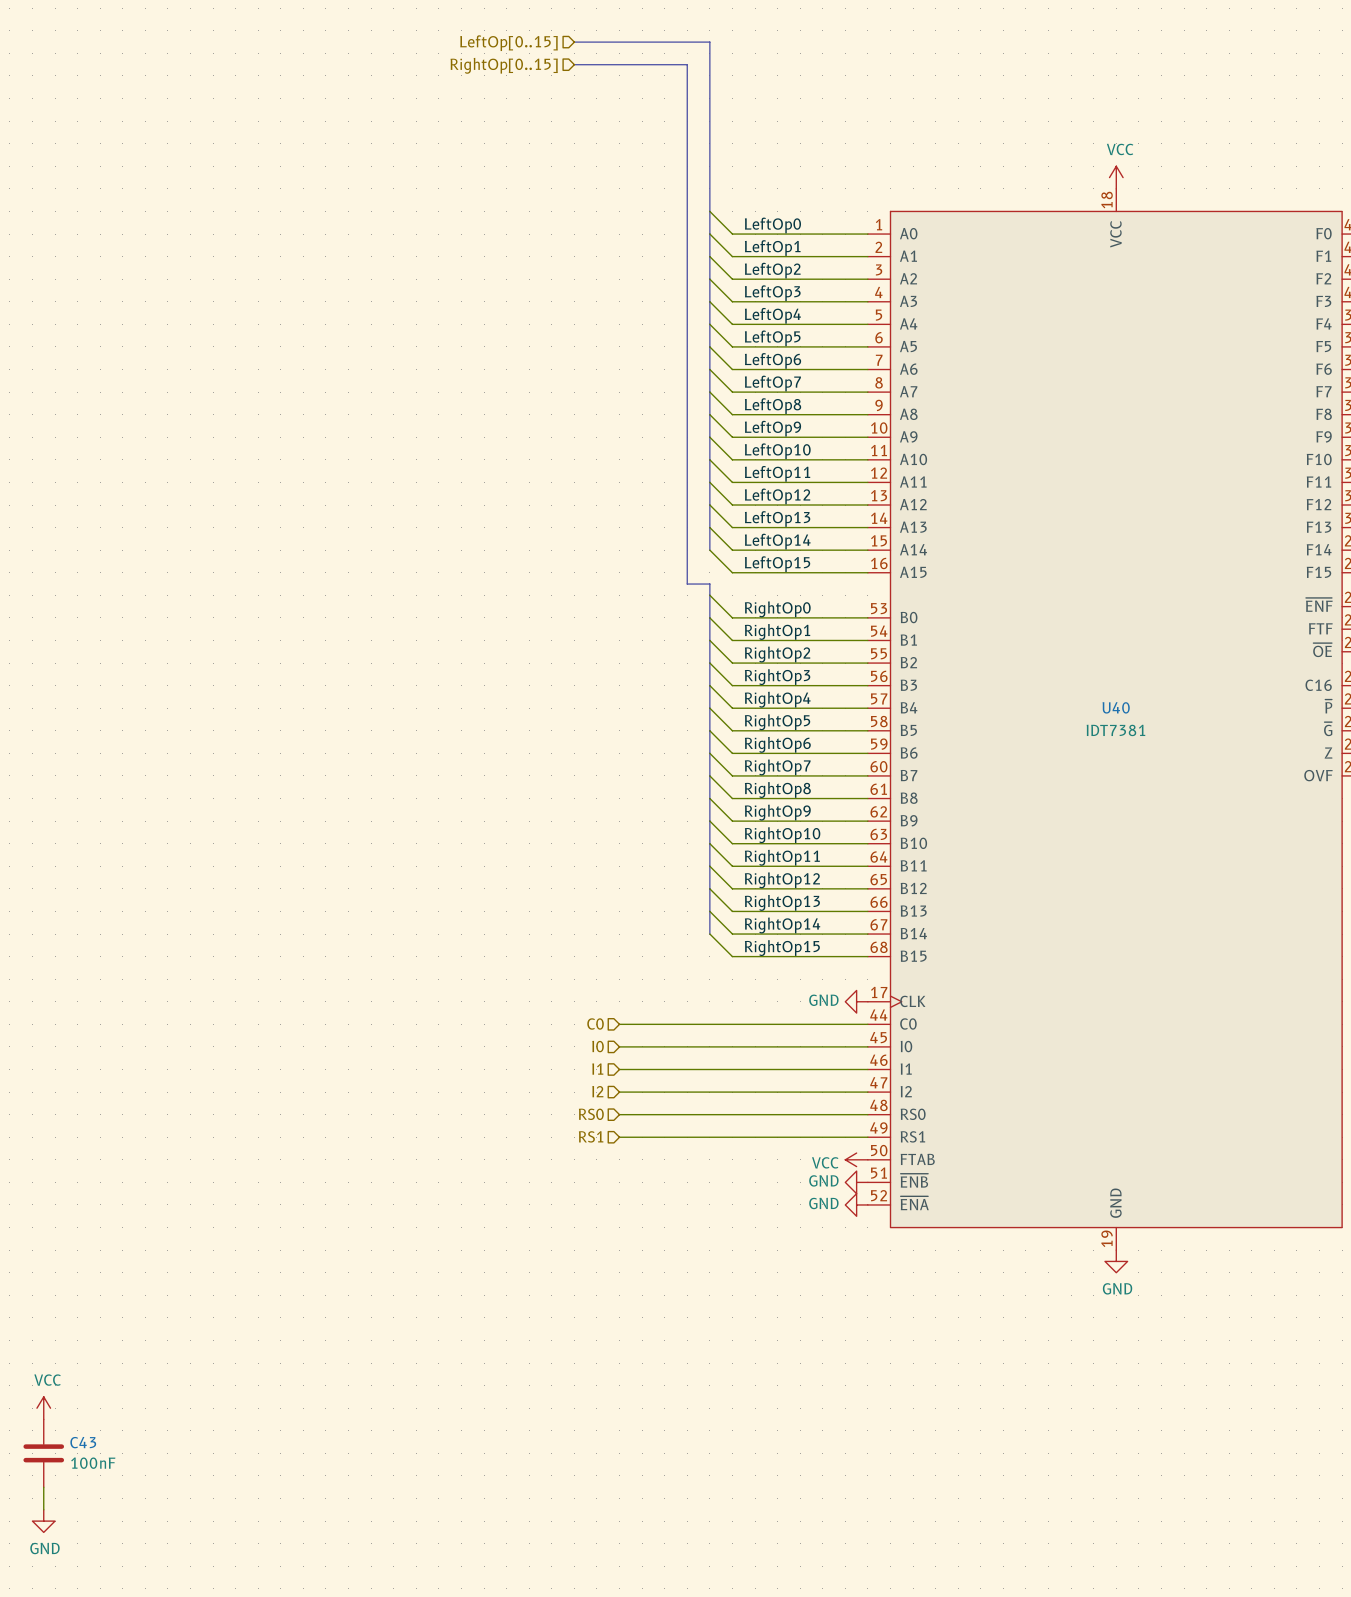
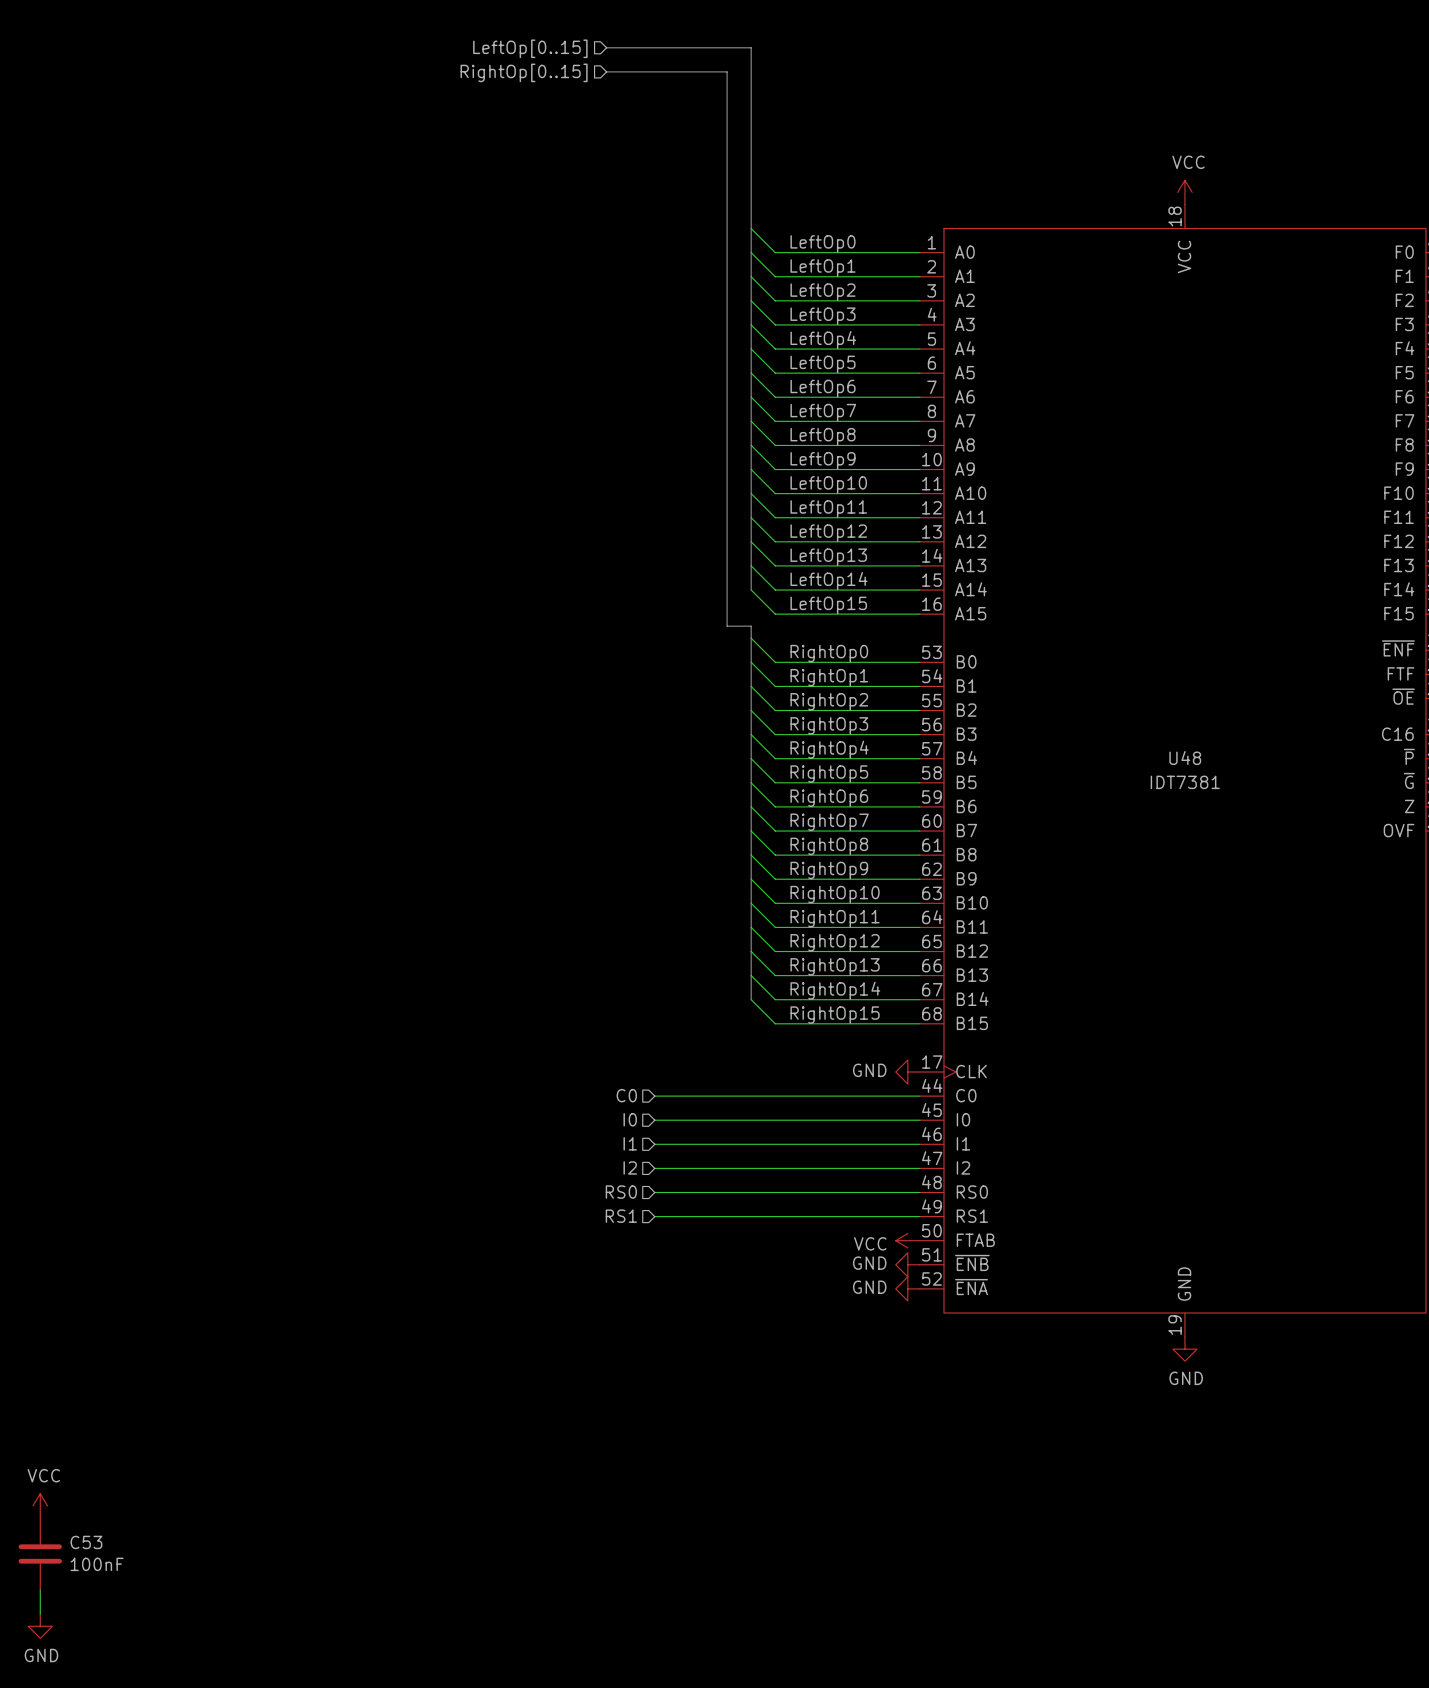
U40 name: U40 (1116, 707) -> U48 (1185, 757)
C43 name: C43 (83, 1442) -> C53 (86, 1542)

